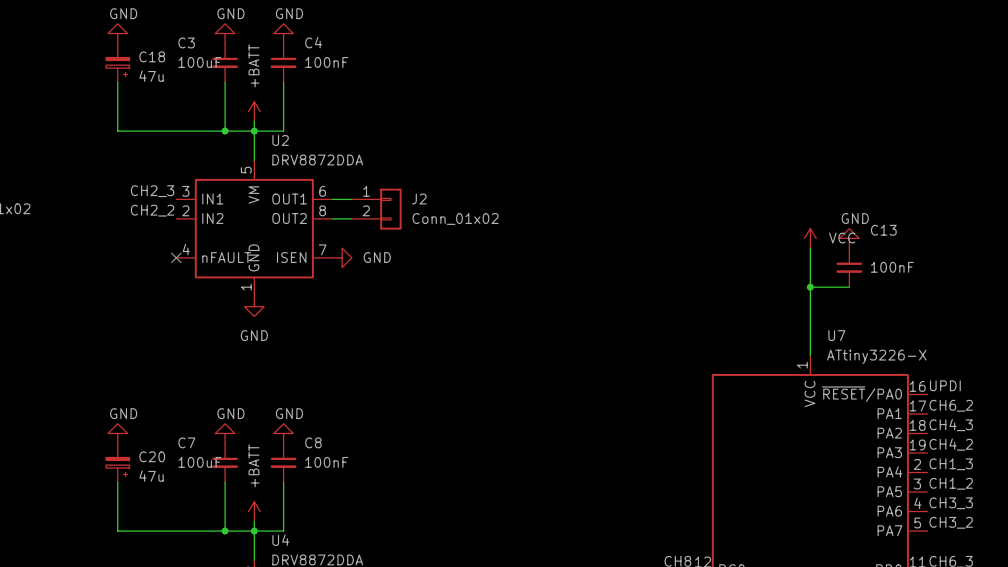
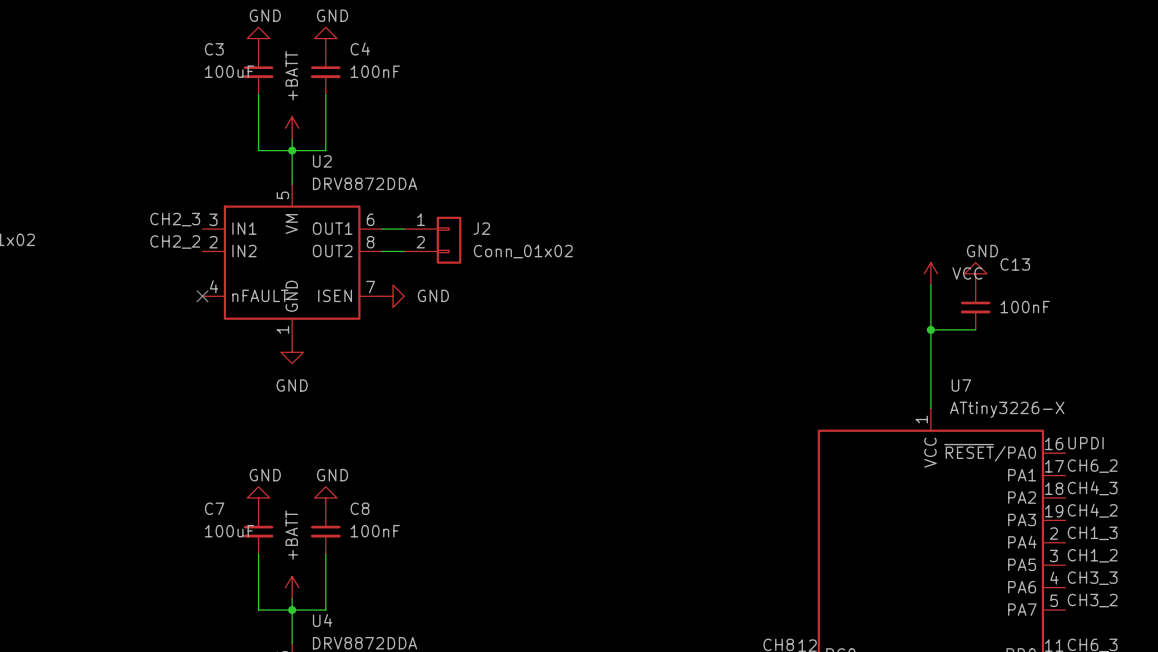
power symbol: GND (117, 33) -> none
C18: 47u (117, 62) -> none
wire: (117, 82) (117, 131) (225, 131) -> none
junction: (225, 131) -> none
power symbol: GND (117, 433) -> none
C20: 47u (117, 462) -> none
wire: (117, 482) (117, 531) (225, 531) -> none
junction: (225, 531) -> none

